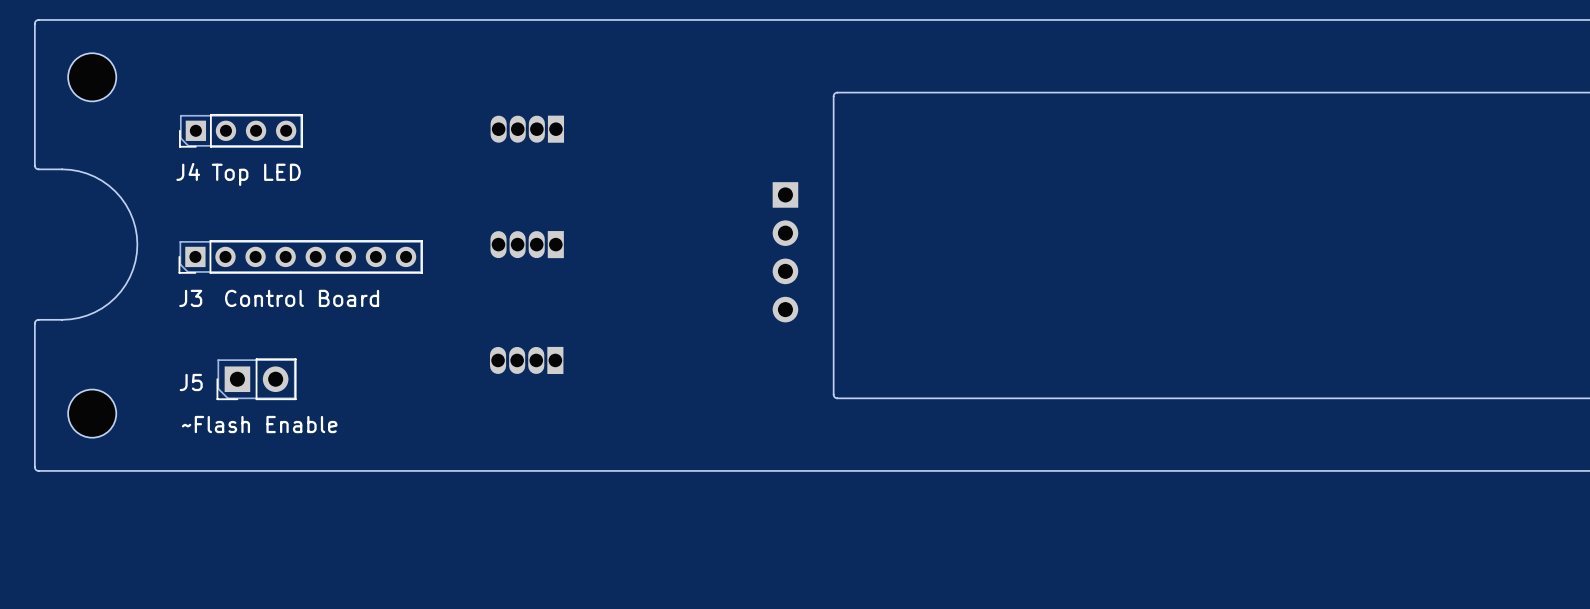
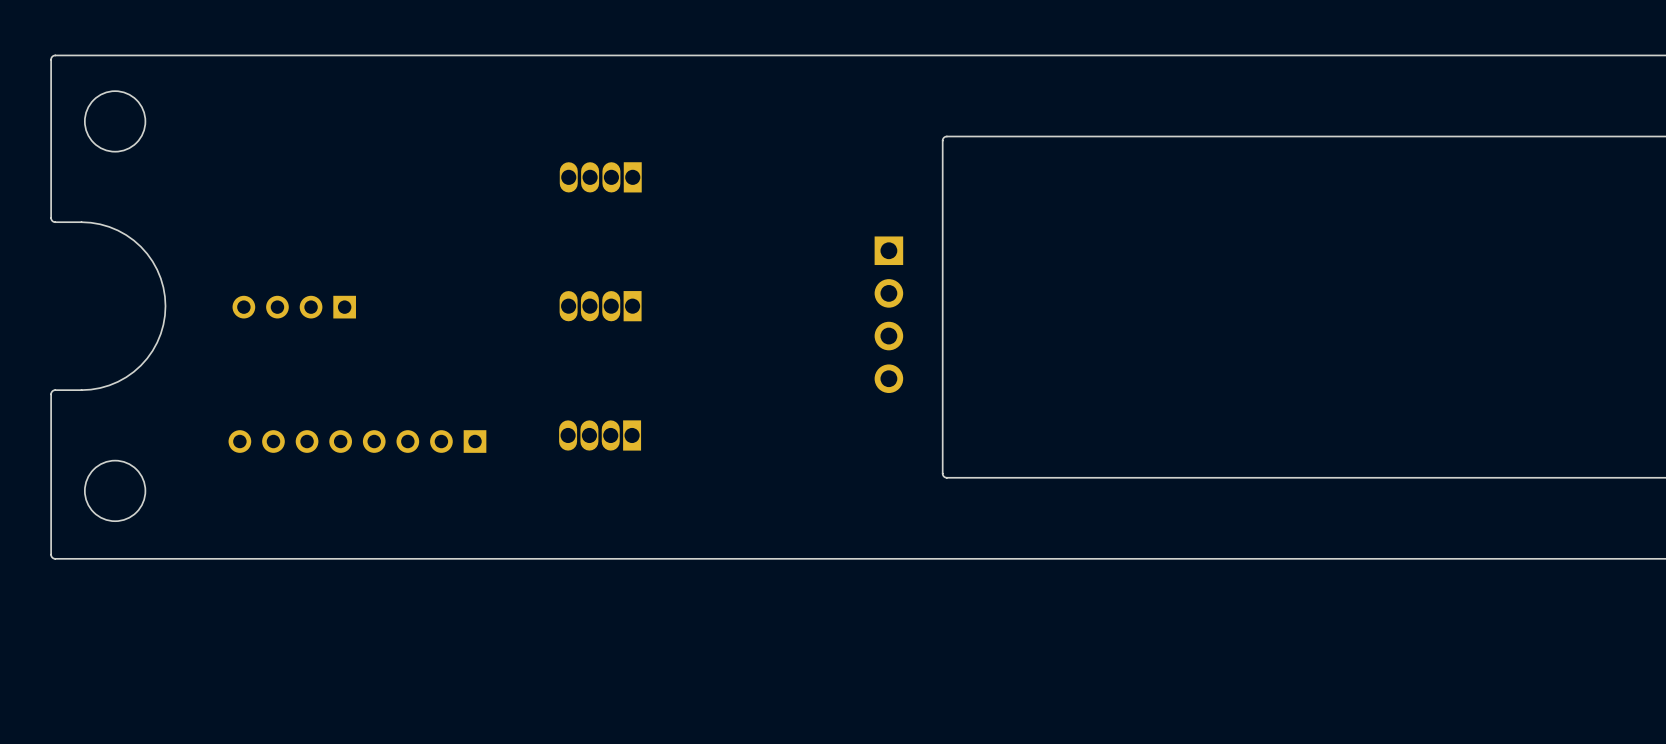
round board edge: none -> [84, 90, 147, 153]
part: (92, 77) -> none
J4 side: bottom (241, 130) -> top (294, 307)
J3 side: bottom (300, 256) -> top (357, 441)
J5: ~Flash Enable (256, 379) -> none
round board edge: none -> [84, 459, 147, 523]
part: (92, 413) -> none

